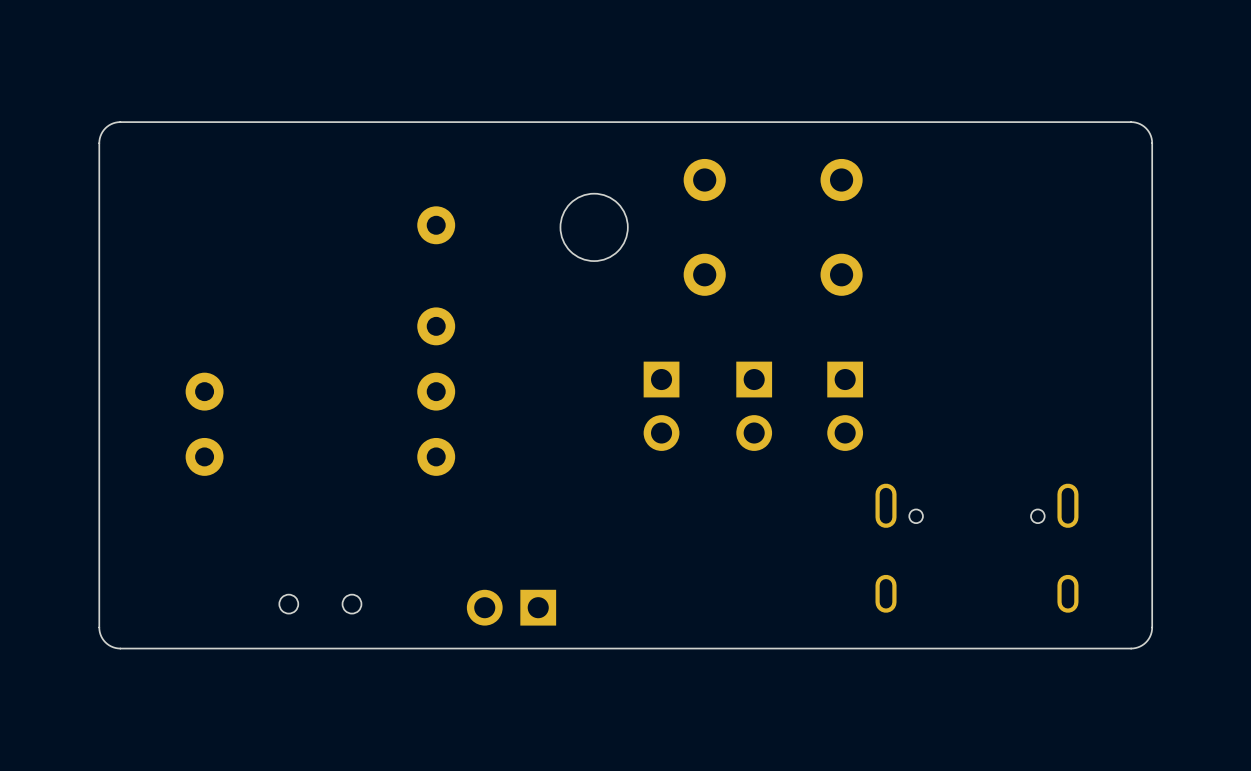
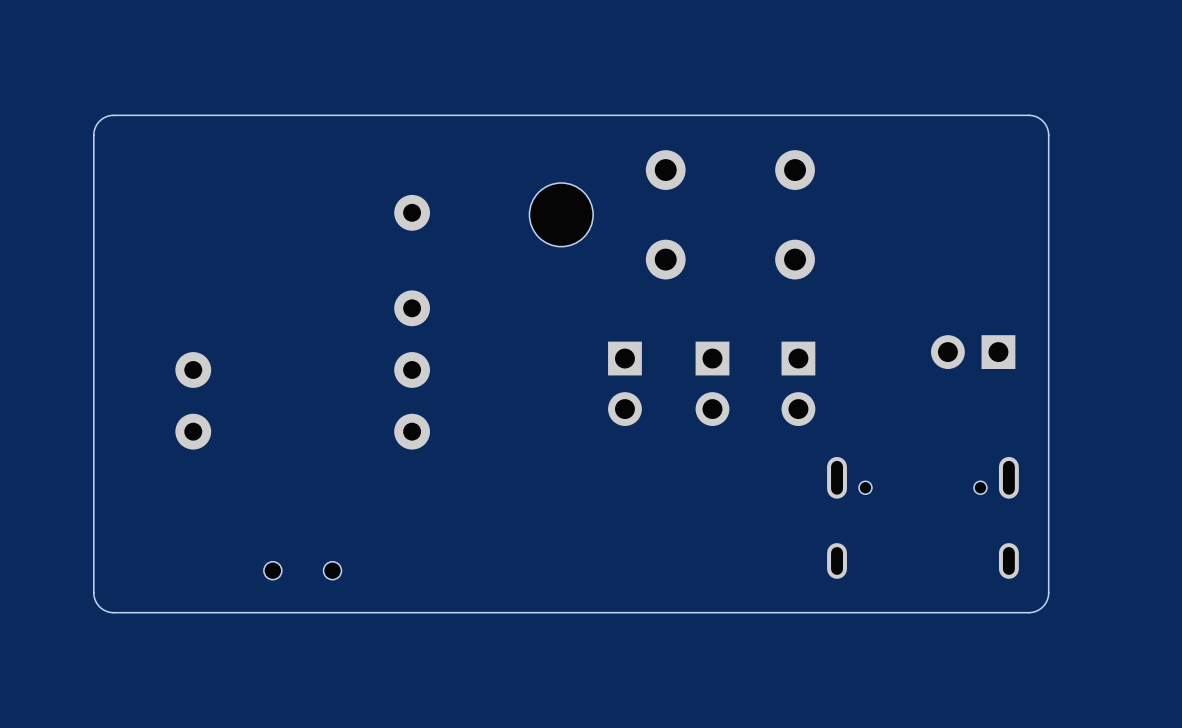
board edge: (1089, 122) (1138, 123) (1148, 131) (1152, 143) (1152, 629) (1147, 640) (1138, 647) (1089, 648) -> (1028, 115) (1042, 121) (1048, 135) (1048, 592) (1042, 606) (1028, 612)
part: none -> (973, 352)
part: (511, 607) -> none

